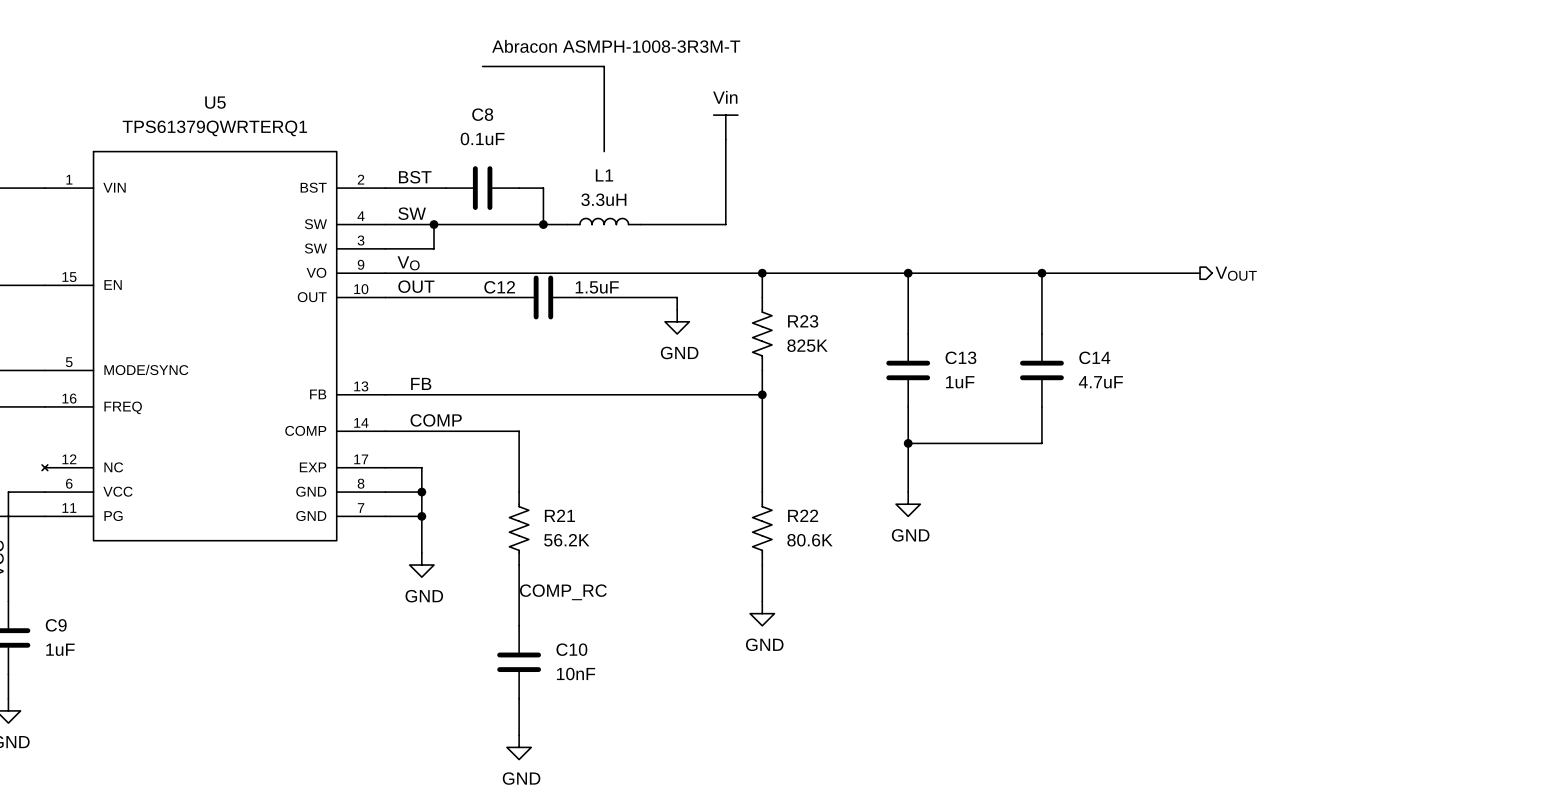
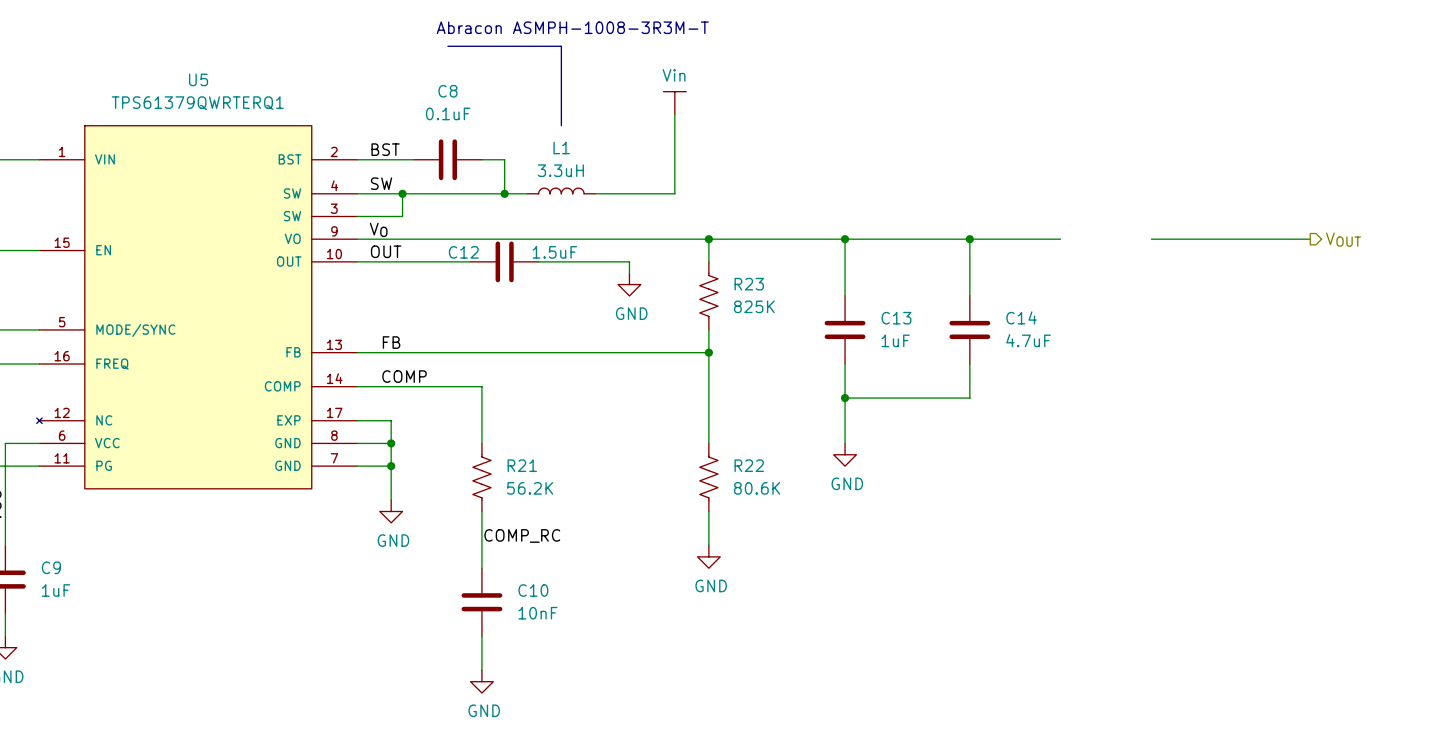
wire: (1139, 273) (1200, 273) -> none
wire: none -> (1151, 239) (1310, 239)
hierarchical label position: VOUT (1236, 273) -> VOUT (1343, 239)

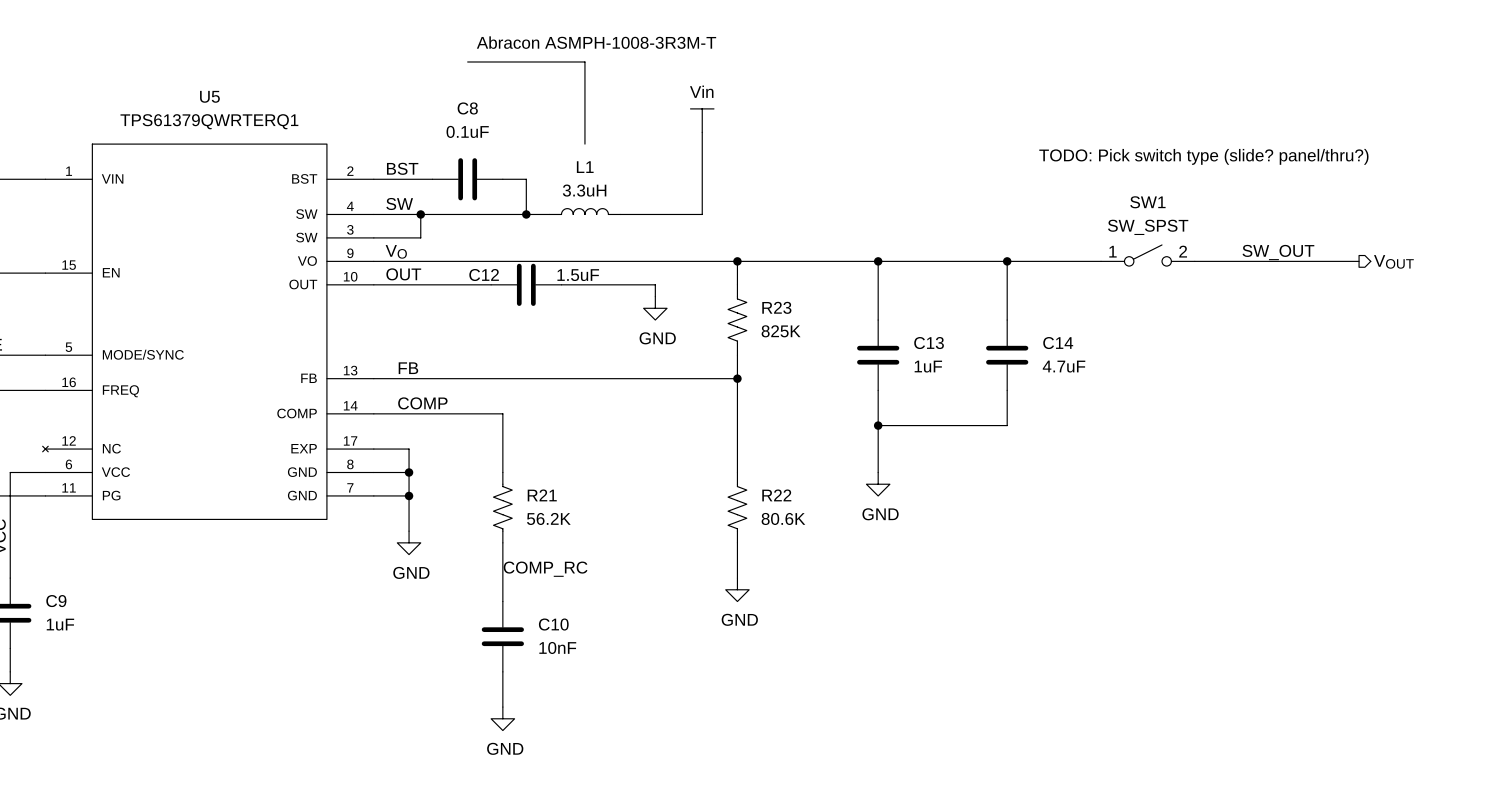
text: none -> TODO: Pick switch type (slide? panel/thru?) (1203, 156)
label: none -> SW_OUT (1278, 252)
SW1: none -> SW_SPST (1147, 255)

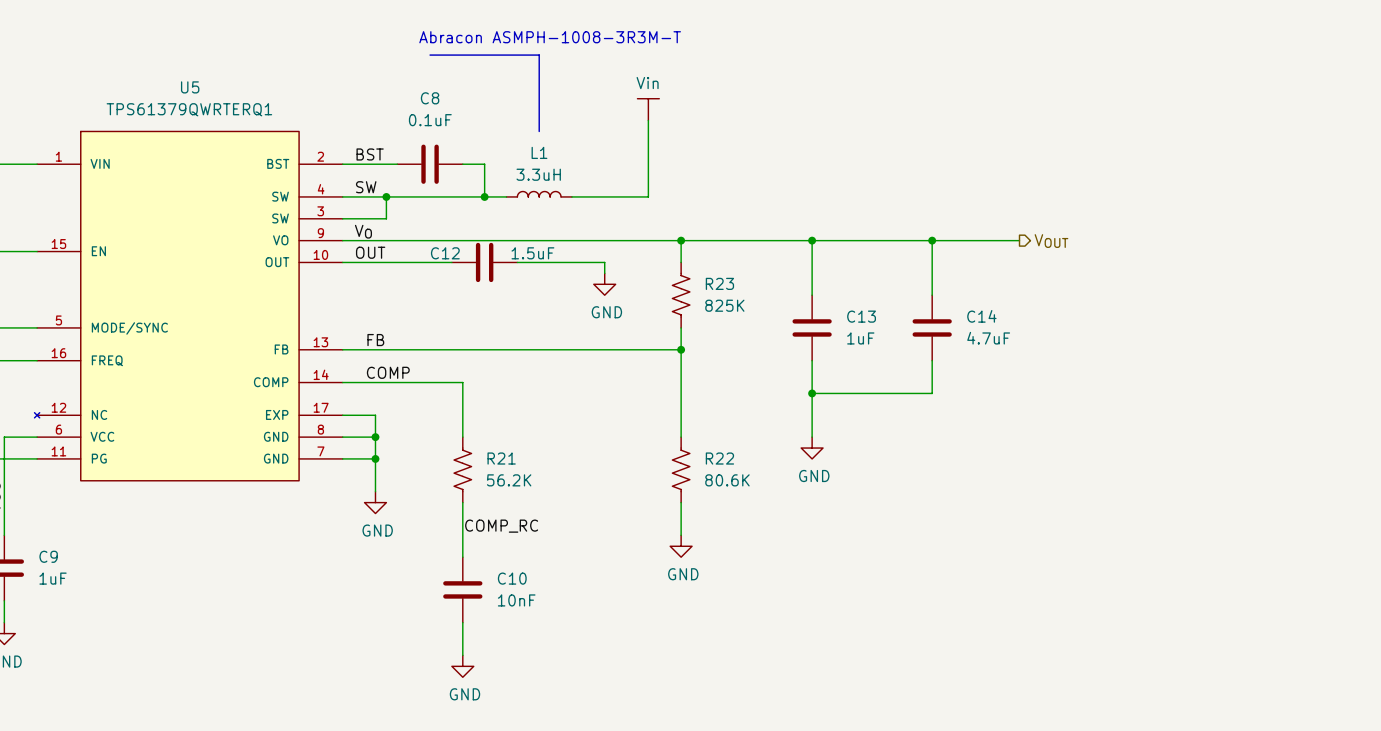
text: TODO: Pick switch type (slide? panel/thru?) (1203, 156) -> none
label: SW_OUT (1278, 252) -> none
SW1: SW_SPST (1147, 255) -> none
hierarchical label: none -> VOUT (1051, 241)
wire: (1194, 261) (1359, 261) -> none
hierarchical label: VOUT (1393, 261) -> none

